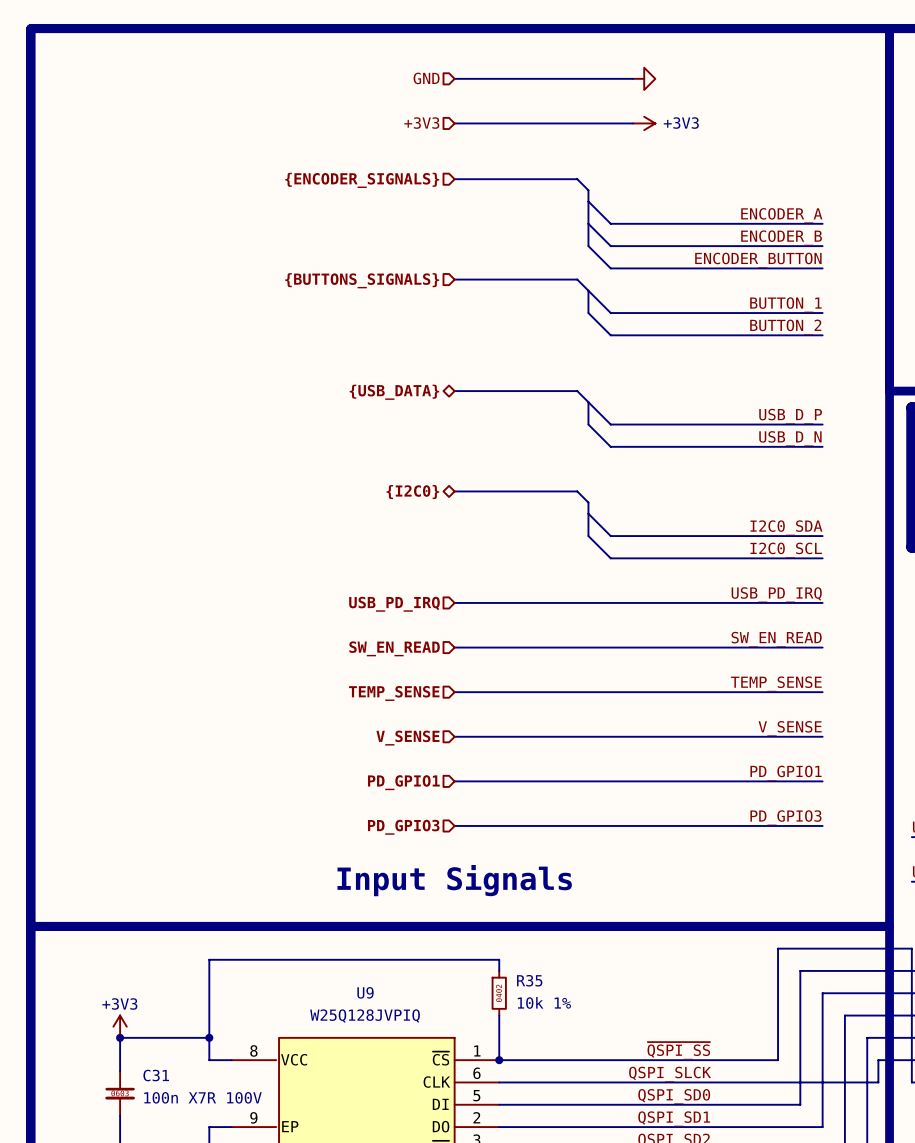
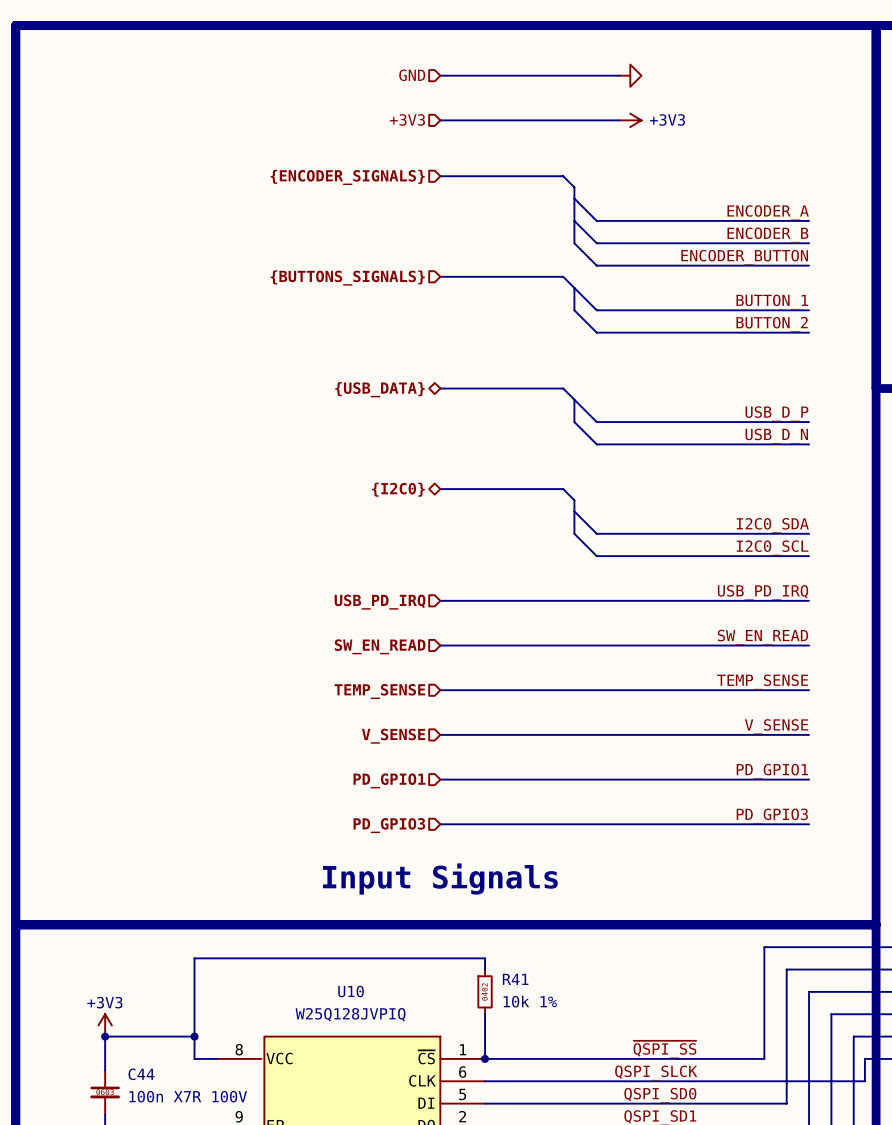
R35 name: R35 (529, 980) -> R41 (515, 979)
U9 name: U9 (365, 992) -> U10 (351, 991)
C31 name: C31 (156, 1075) -> C44 (141, 1074)

